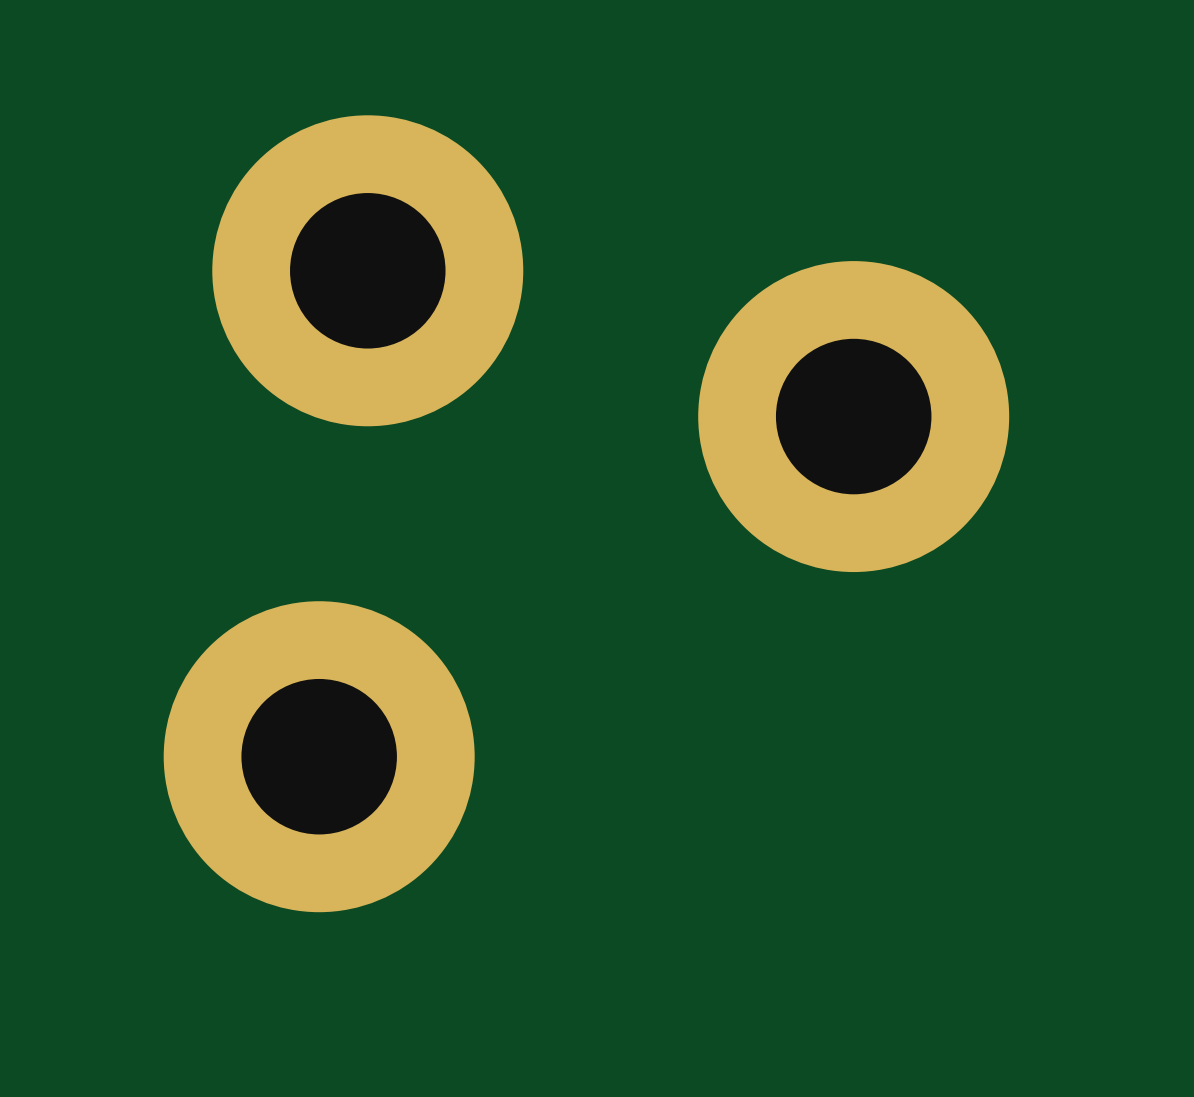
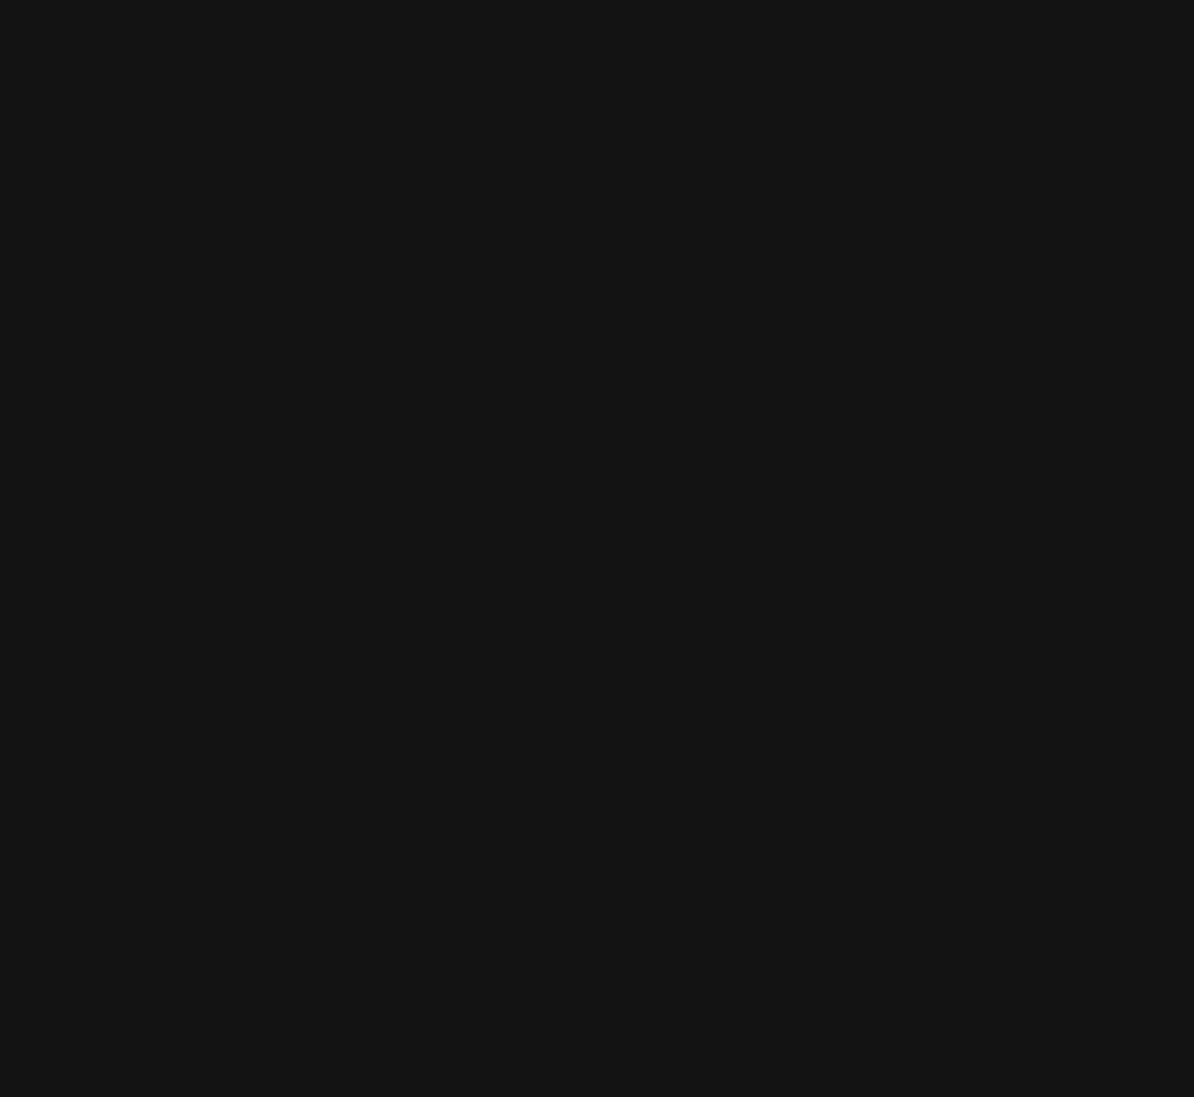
part: (367, 270) -> none
part: (853, 416) -> none
part: (319, 756) -> none

